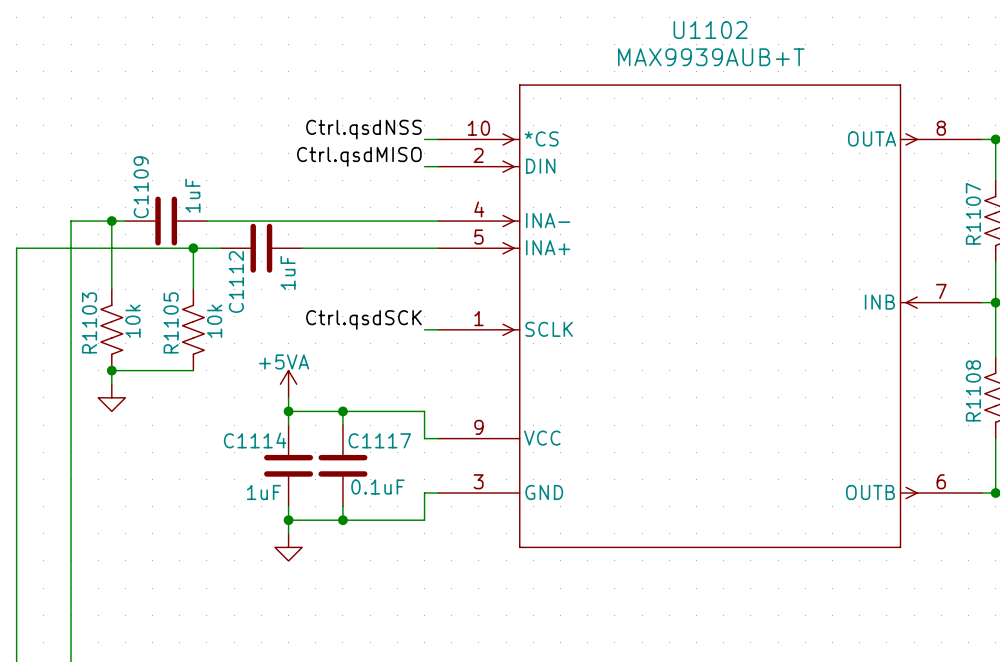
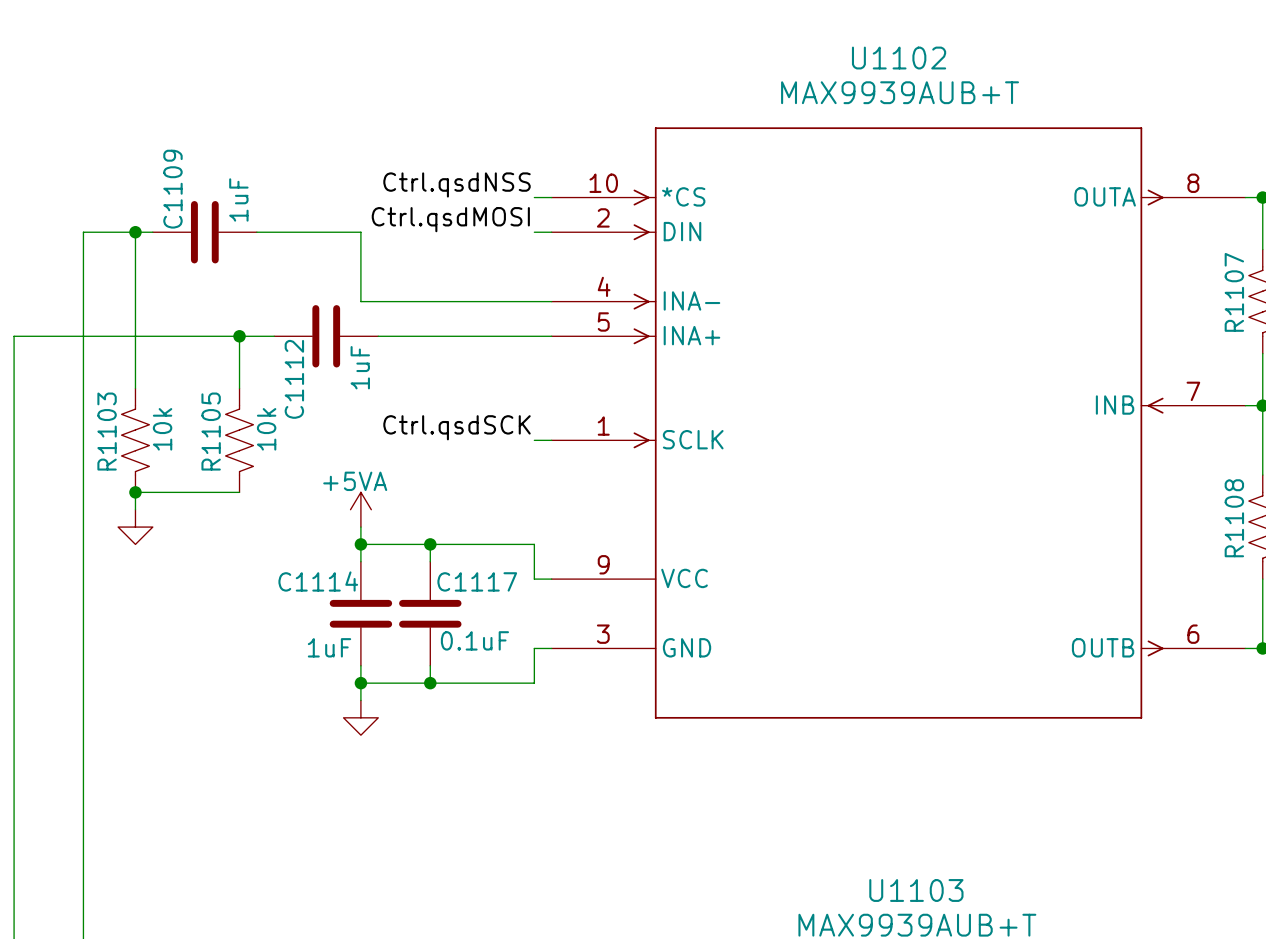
label: Ctrl.qsdMISO (359, 156) -> Ctrl.qsdMOSI (450, 219)
wire: none -> (135, 232) (135, 301)
wire: (71, 221) (125, 221) -> (83, 301) (83, 232) (152, 232)
junction position: (111, 221) -> (135, 232)
C1109 position: (166, 221) -> (204, 232)
wire: (206, 221) (288, 221) -> (256, 232) (360, 232) (360, 301)

